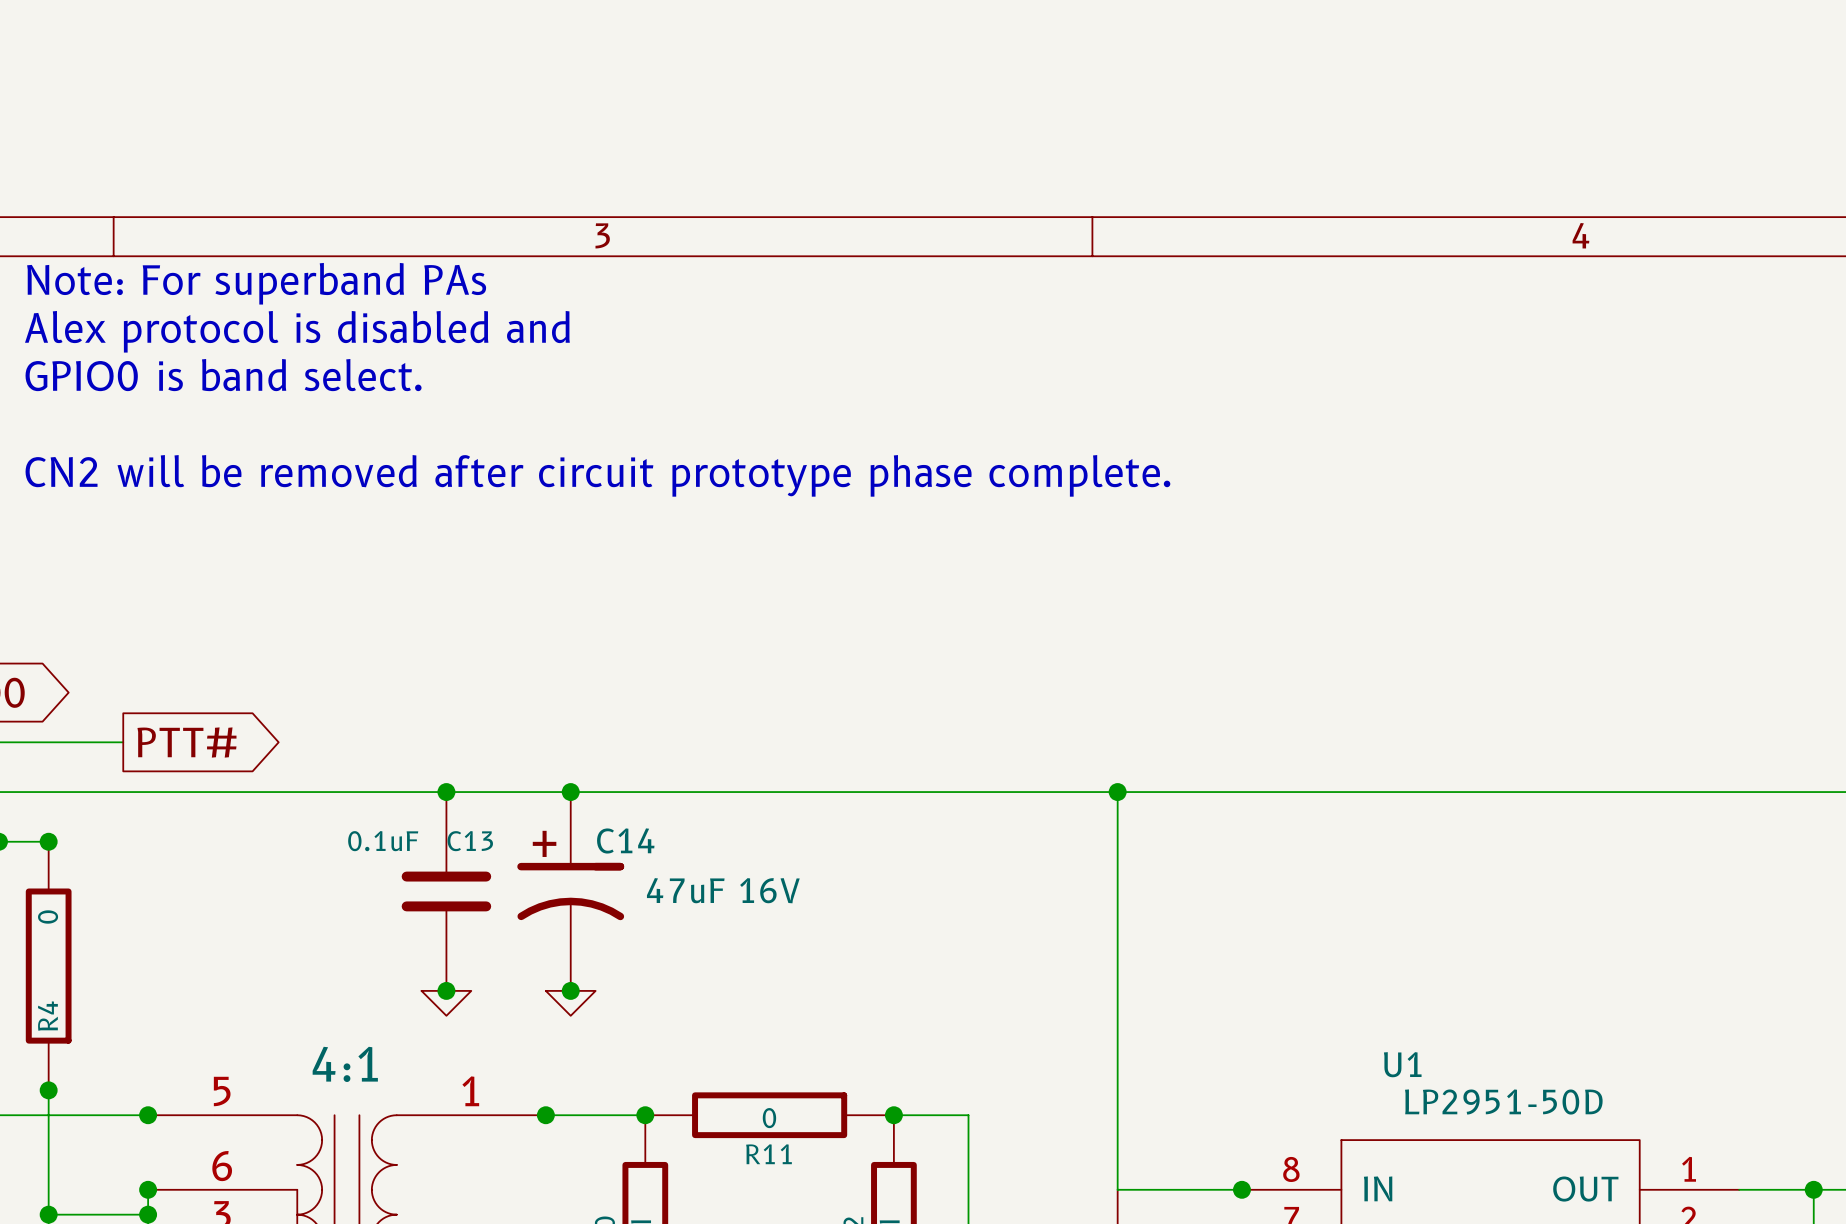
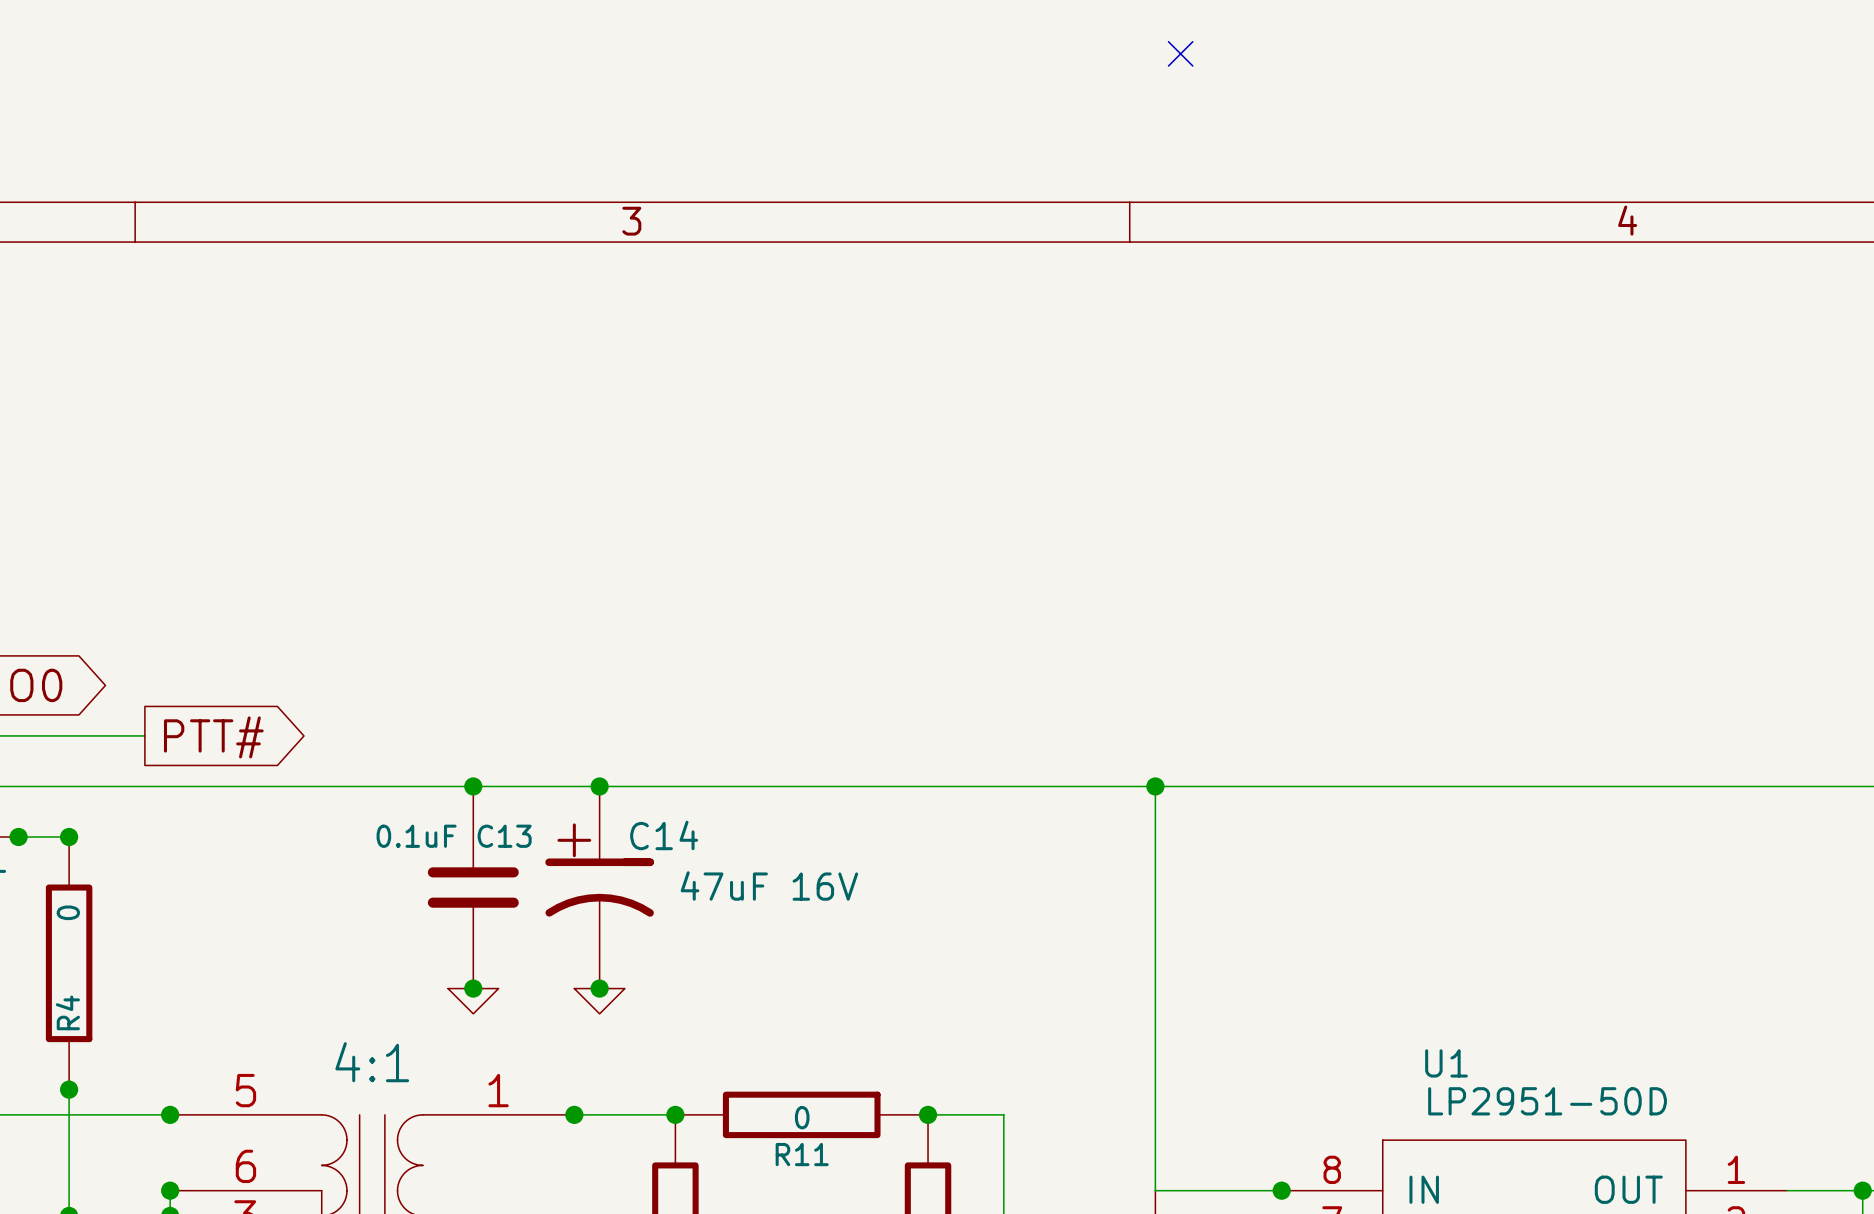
no-connect mark: none -> (1180, 53)
text: Note: For superband PAs (256, 283) -> none
text: Alex protocol is disabled and (297, 331) -> none
text: GPIO0 is band select. (223, 375) -> none
text: CN2 will be removed after circuit prototype phase complete. (597, 475) -> none

